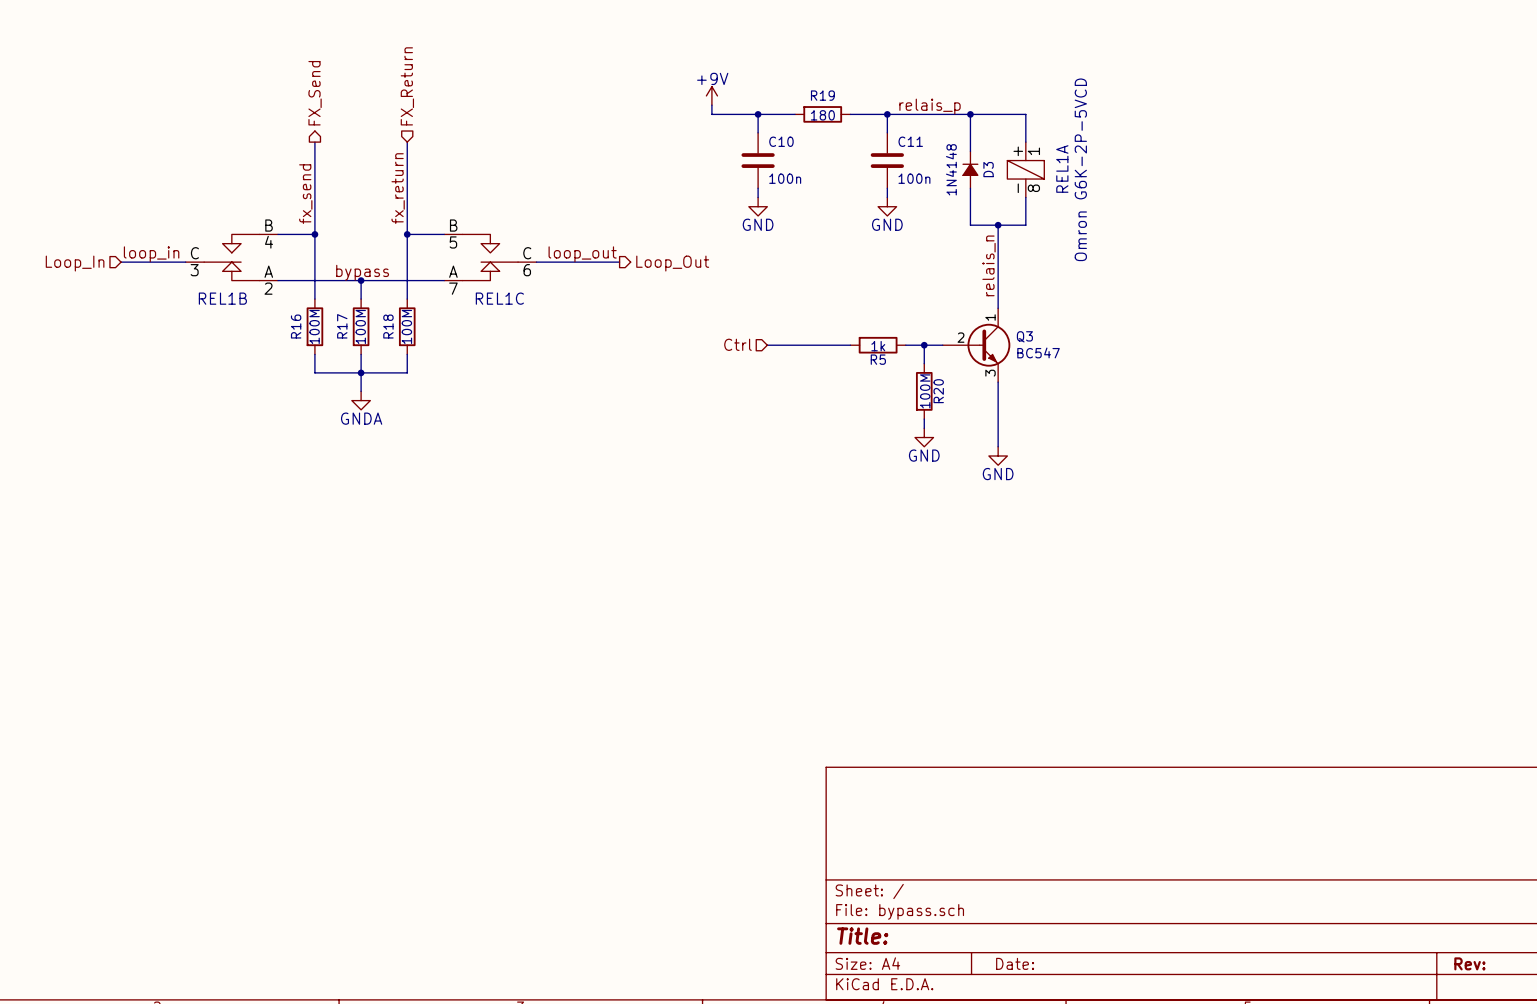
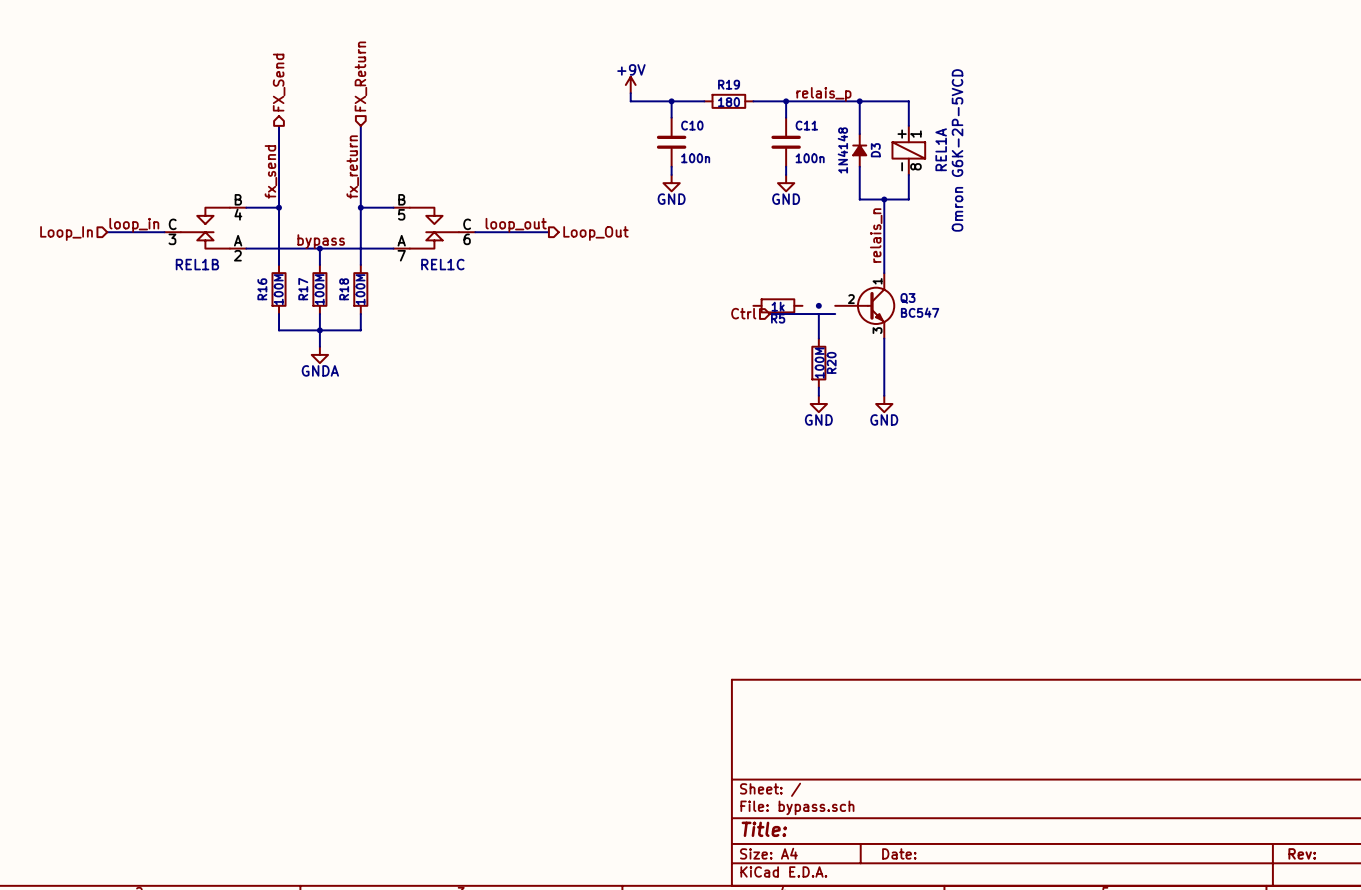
hierarchical label position: Ctrl (737, 344) -> Ctrl (743, 313)
wire: (767, 345) (850, 345) -> none
wire: (905, 345) (942, 345) -> none
wire: (924, 345) (924, 354) -> none
wire: none -> (769, 314) (835, 314)
R20 position: (924, 391) -> (818, 363)
wire: (924, 419) (924, 428) -> (818, 387) (818, 395)
power symbol position: GND (924, 437) -> GND (818, 403)

